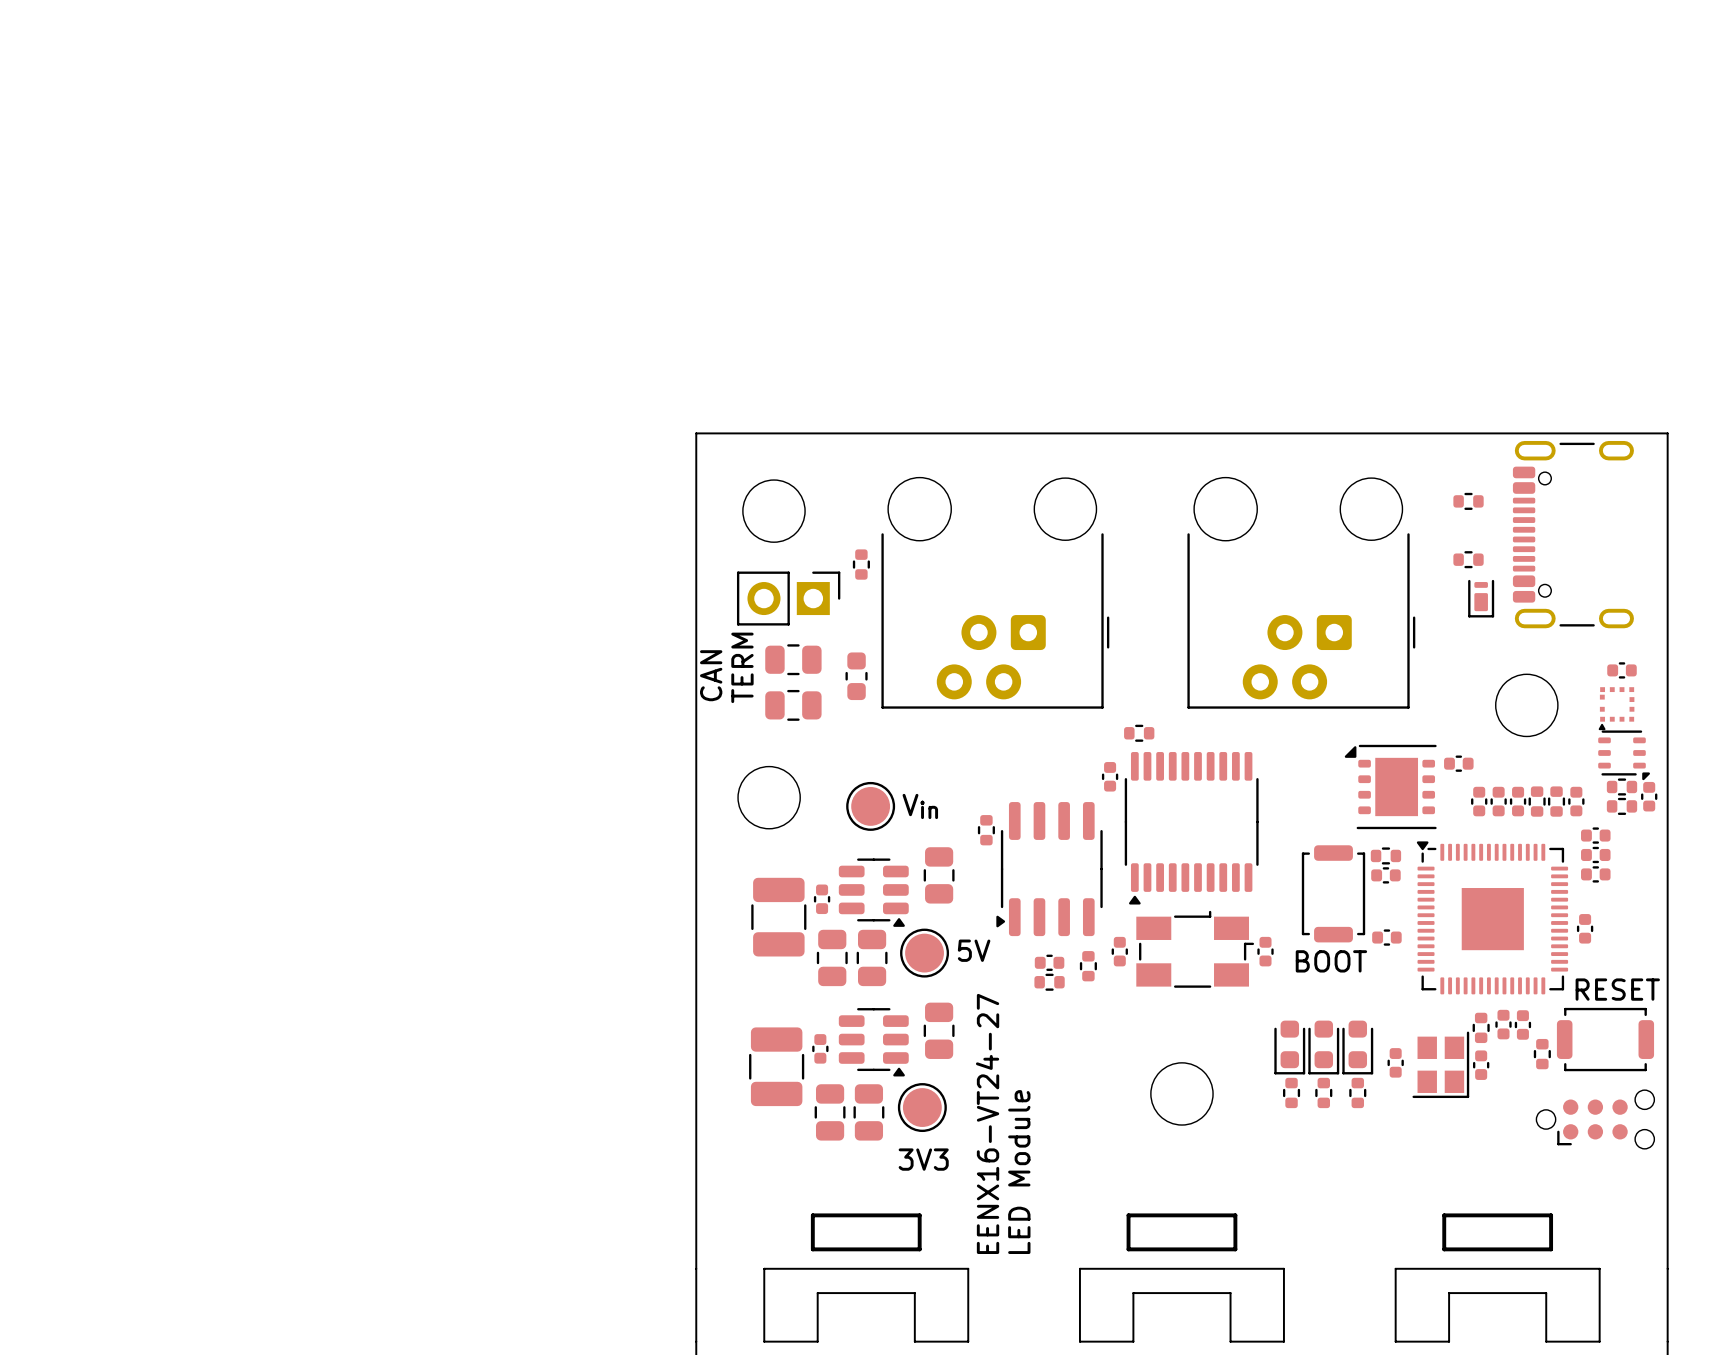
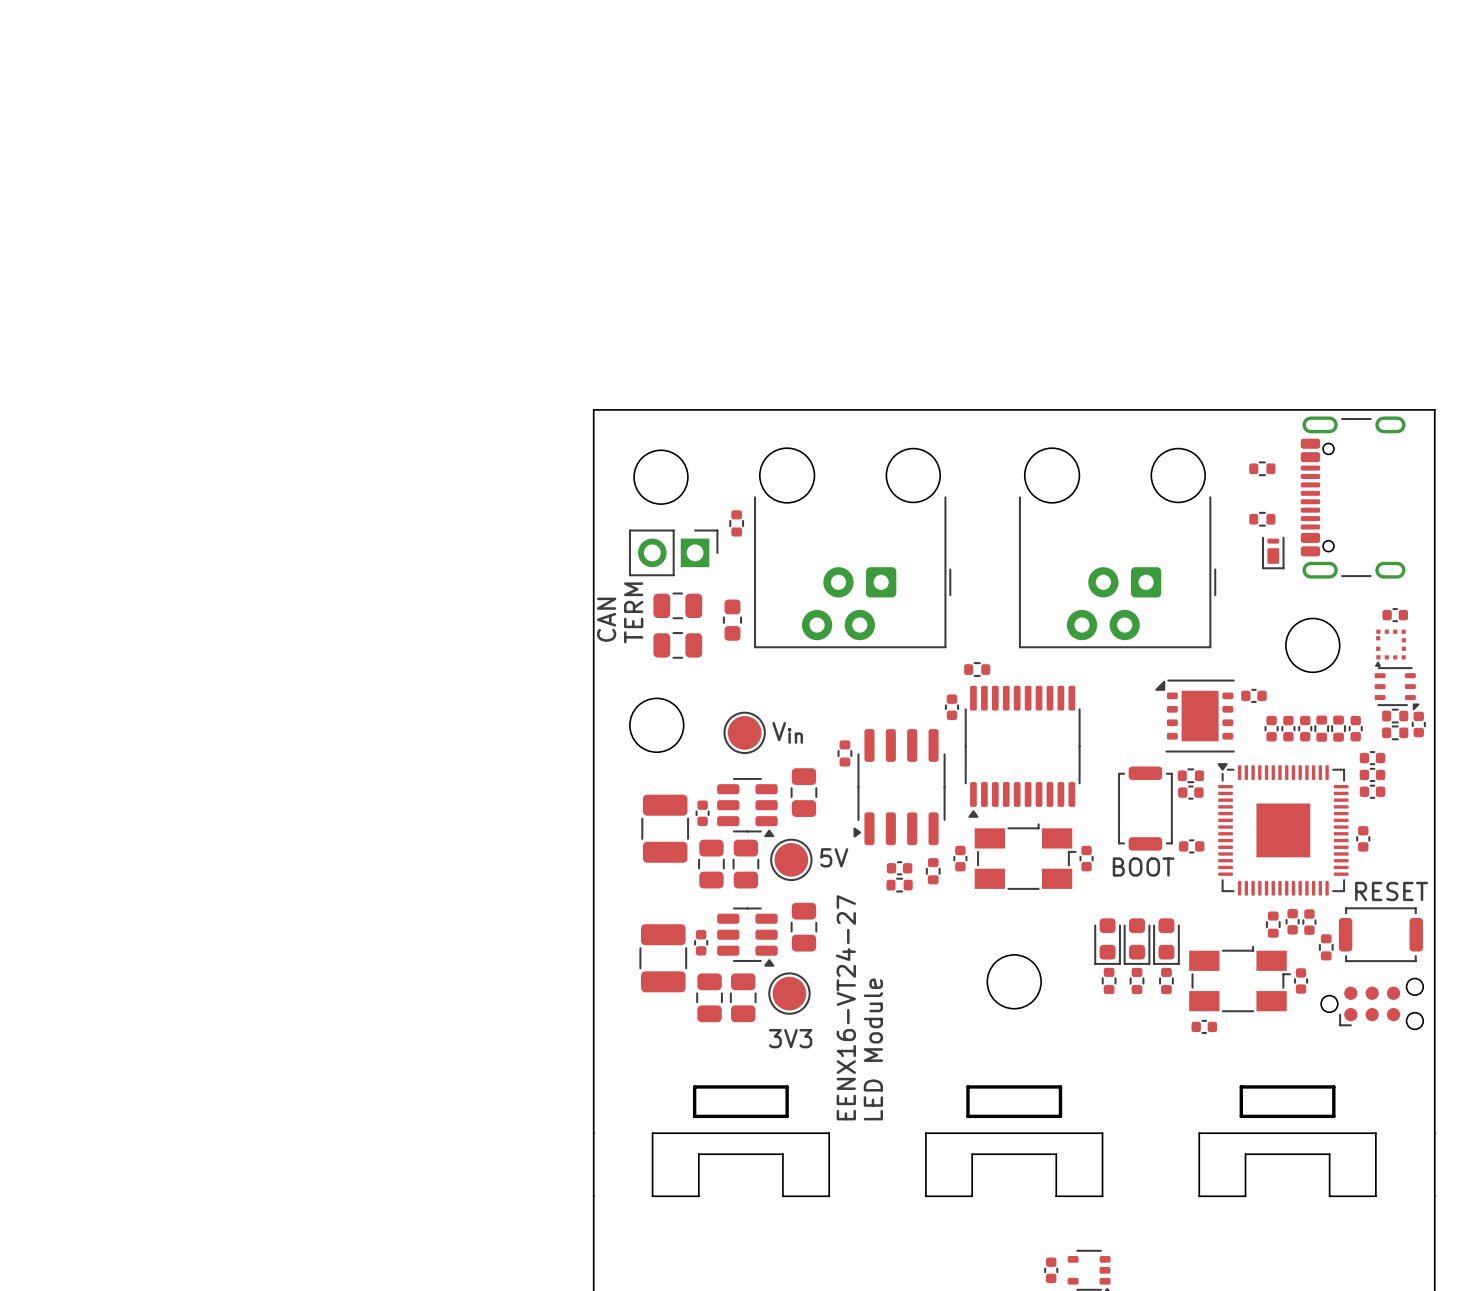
part: (1395, 1062) -> none
part: (1440, 1064) -> none
part position: (1481, 1065) -> (1301, 980)
part: none -> (1240, 978)
part: none -> (1204, 1026)

